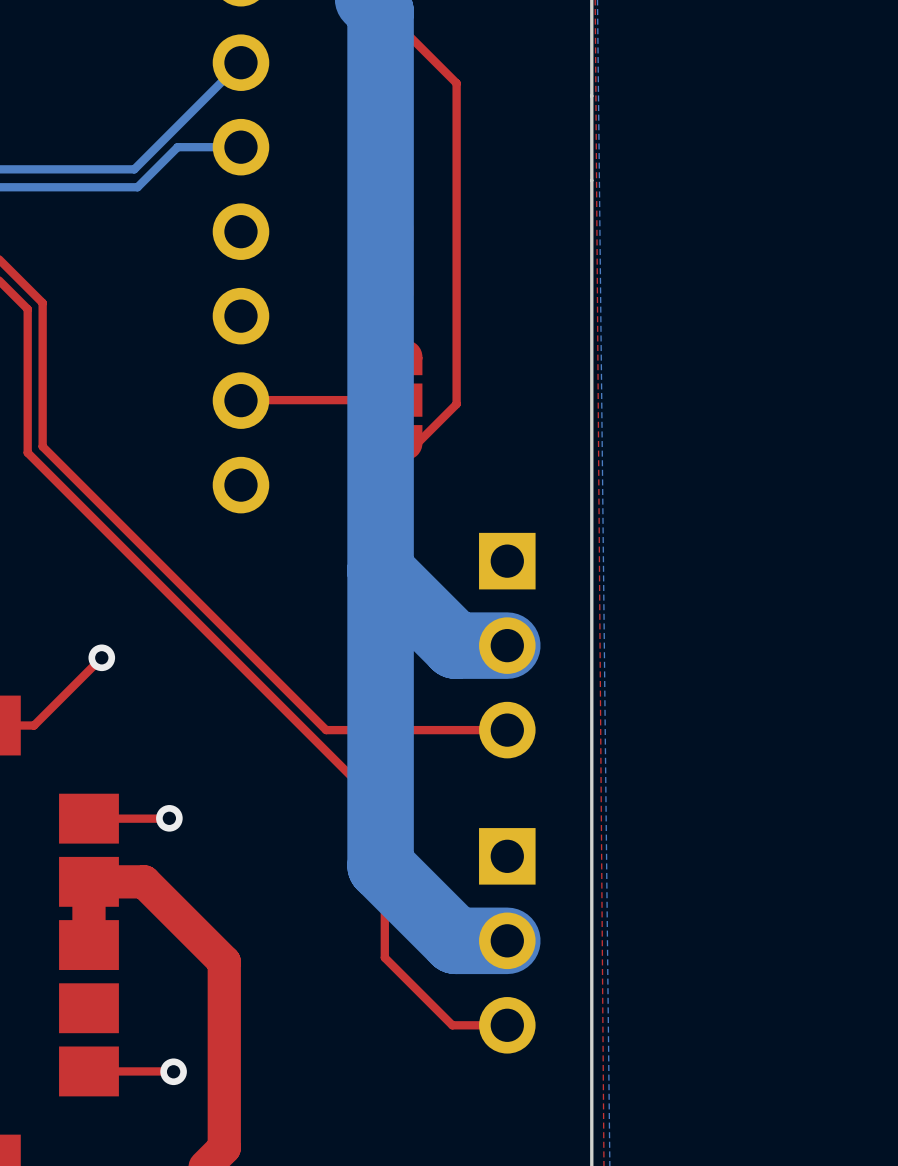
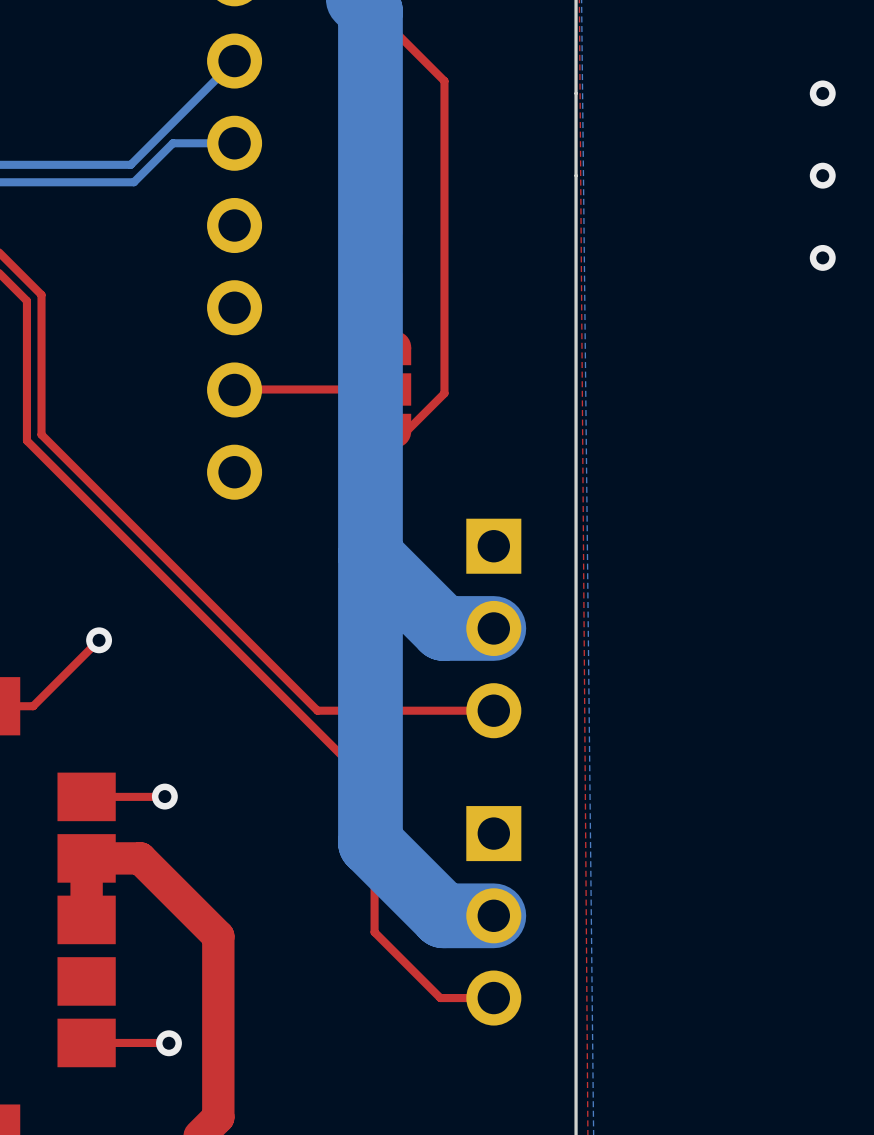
via: none -> (822, 93)
via: none -> (822, 175)
via: none -> (822, 257)

